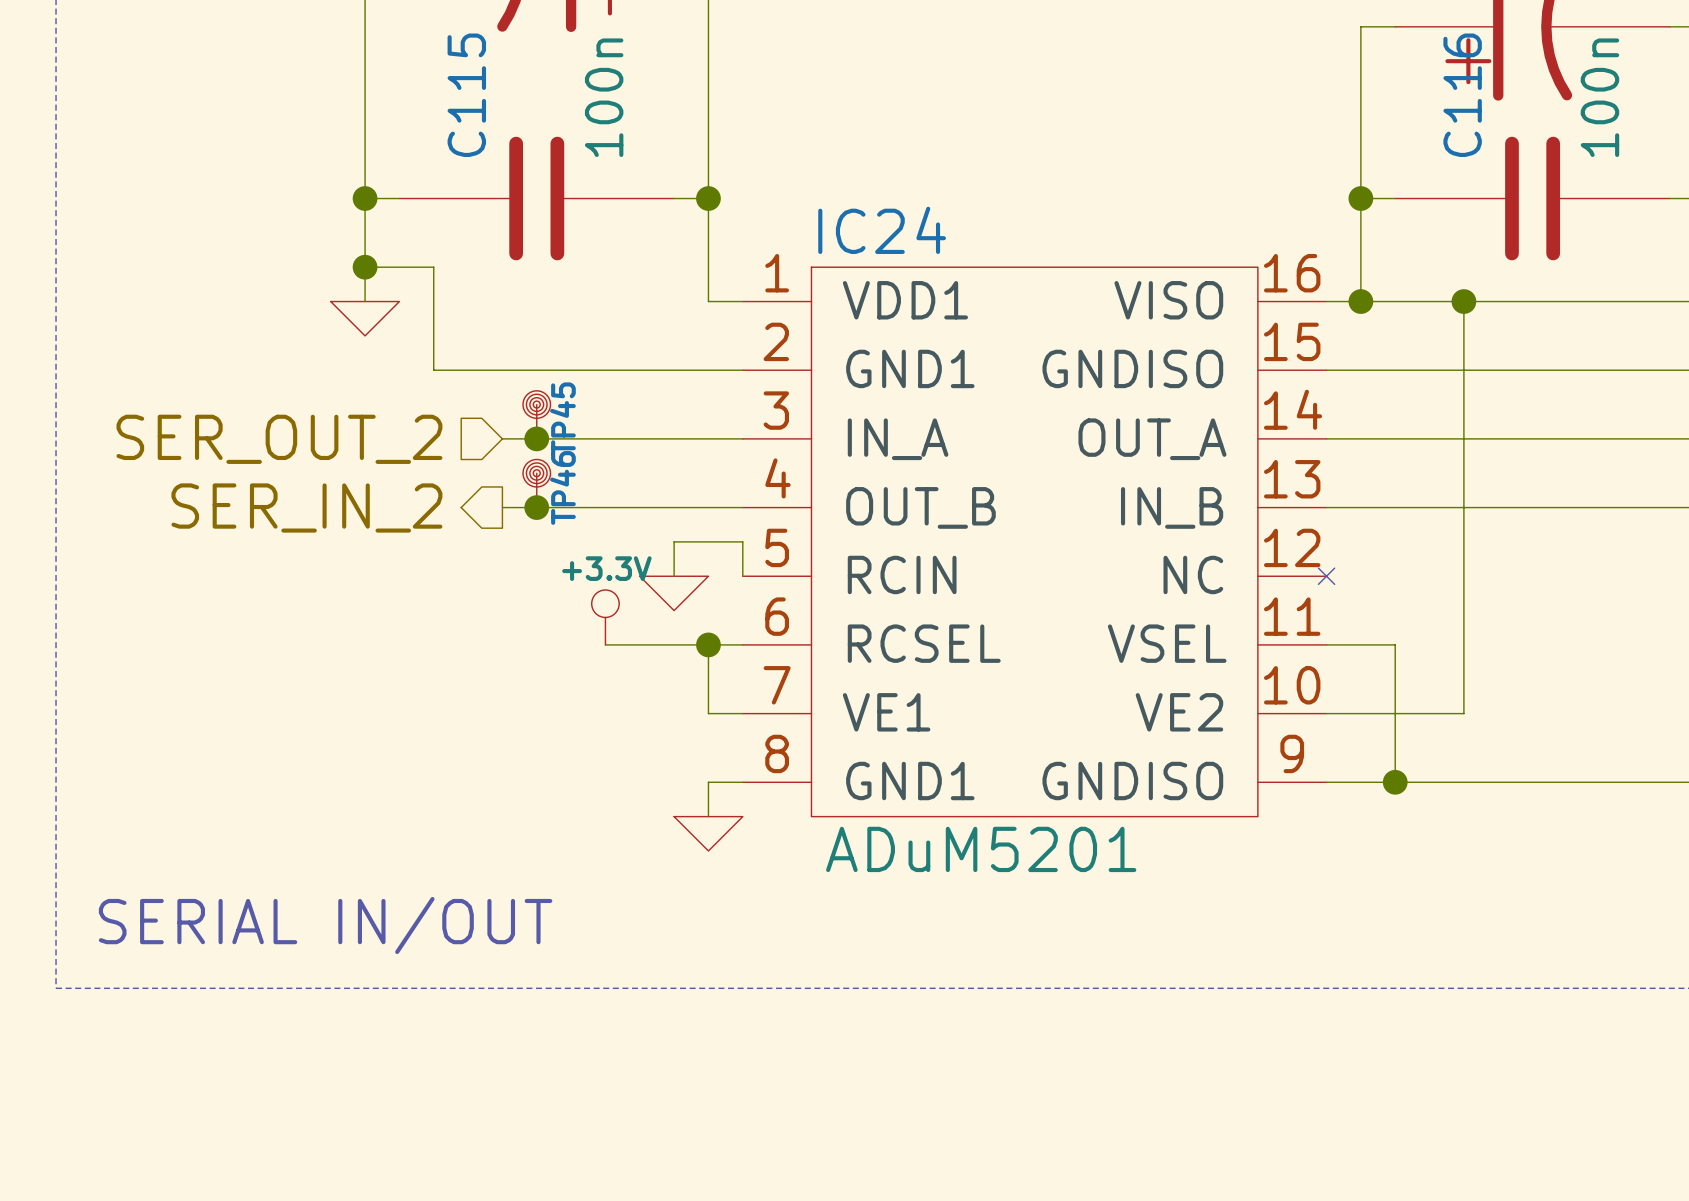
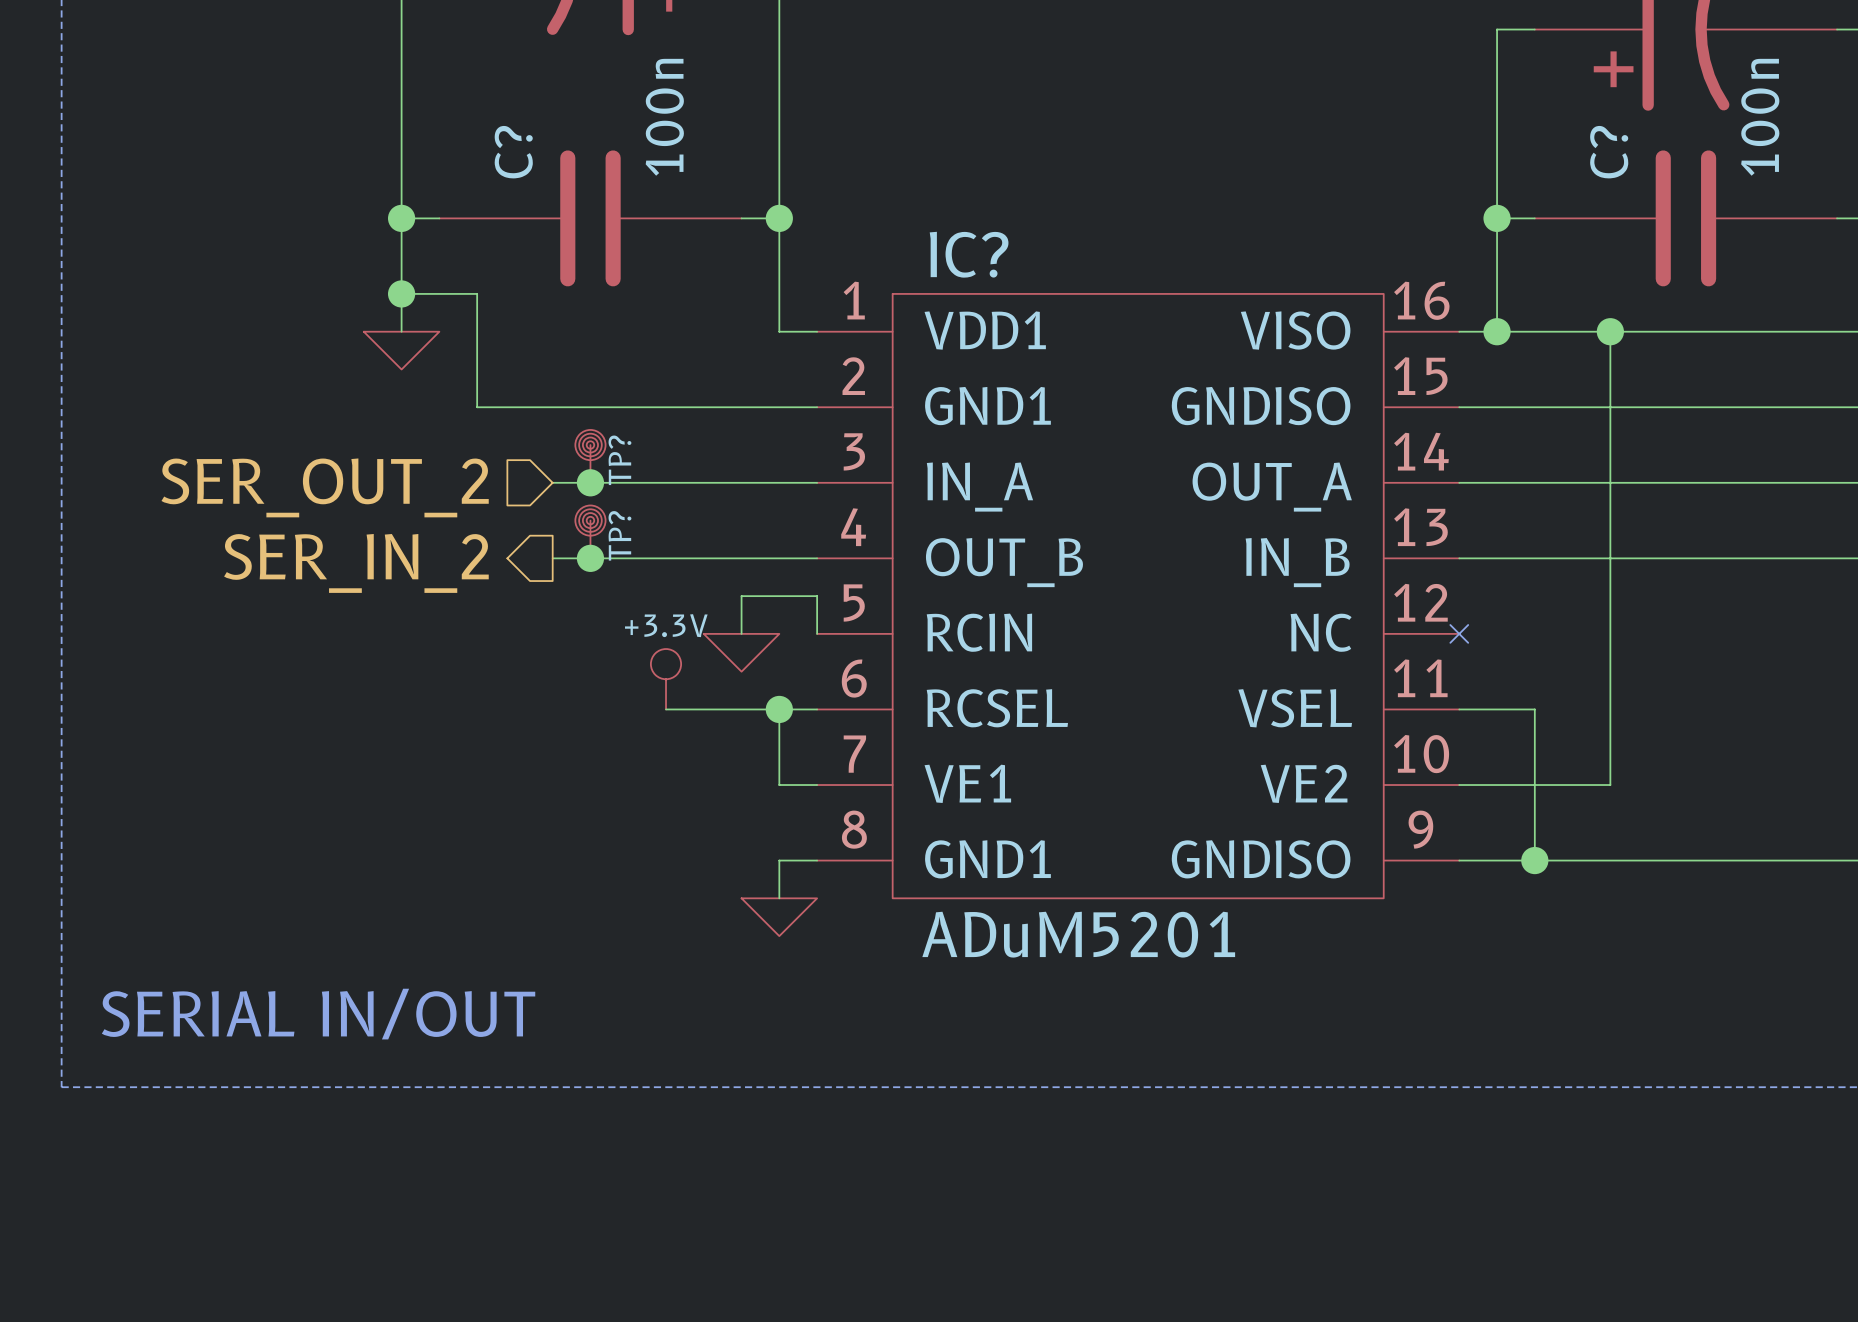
C115 name: C115 (466, 95) -> C? (513, 152)
C116 name: C116 (1462, 95) -> C? (1609, 152)
IC24 name: IC24 (882, 230) -> IC? (969, 254)
TP45 name: TP45 (562, 419) -> TP? (619, 460)
TP46 name: TP46 (562, 487) -> TP? (619, 535)

